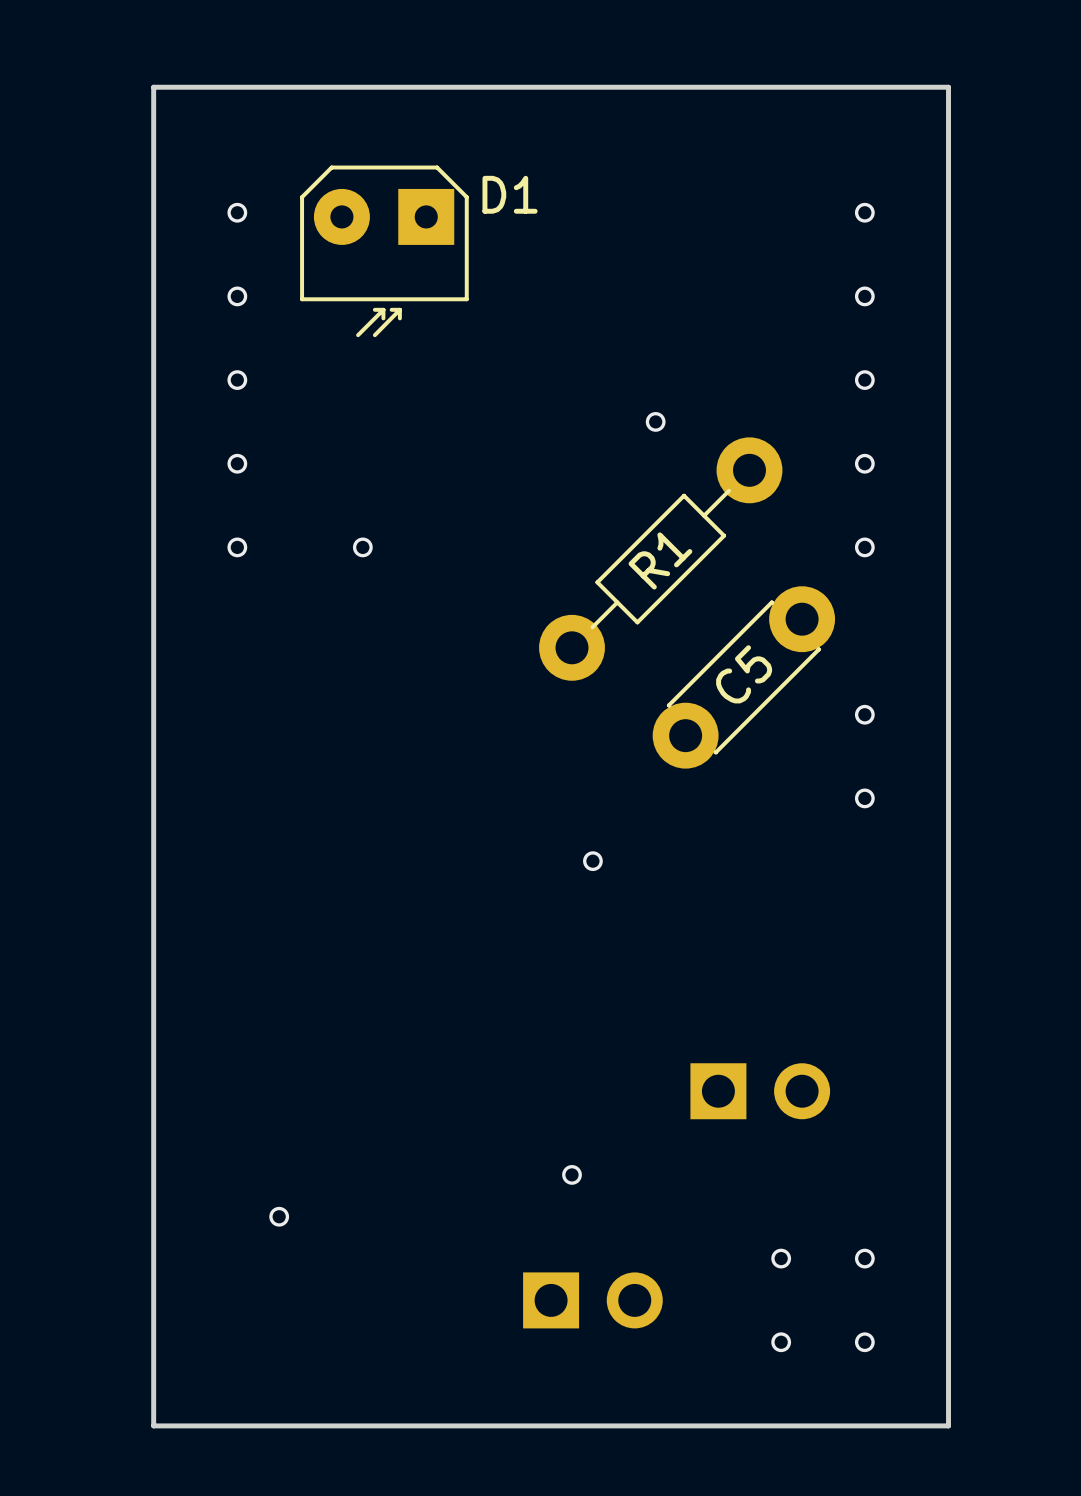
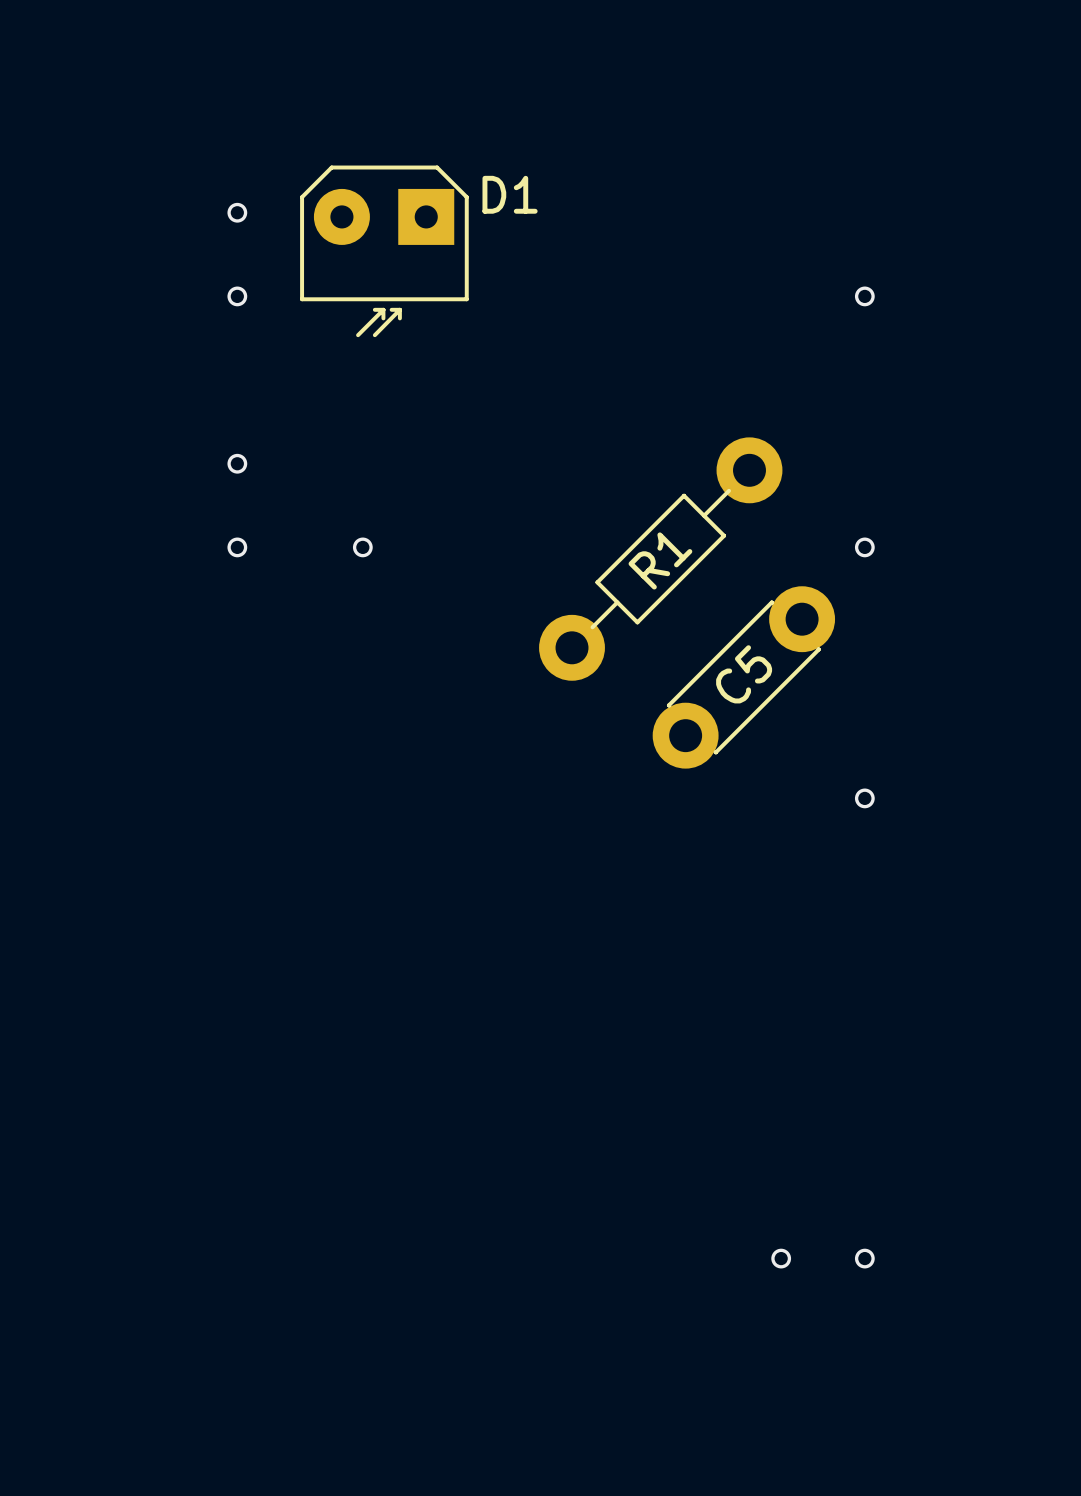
board edge: (153, 87) (153, 1425) (948, 1425) (948, 87) (153, 87) -> none
via: (864, 212) -> none
via: (237, 380) -> none
via: (864, 380) -> none
via: (655, 421) -> none
via: (864, 463) -> none
via: (864, 714) -> none
via: (592, 861) -> none
part: (760, 1091) -> none
via: (572, 1174) -> none
via: (279, 1216) -> none
part: (592, 1300) -> none
via: (781, 1342) -> none
via: (864, 1342) -> none

